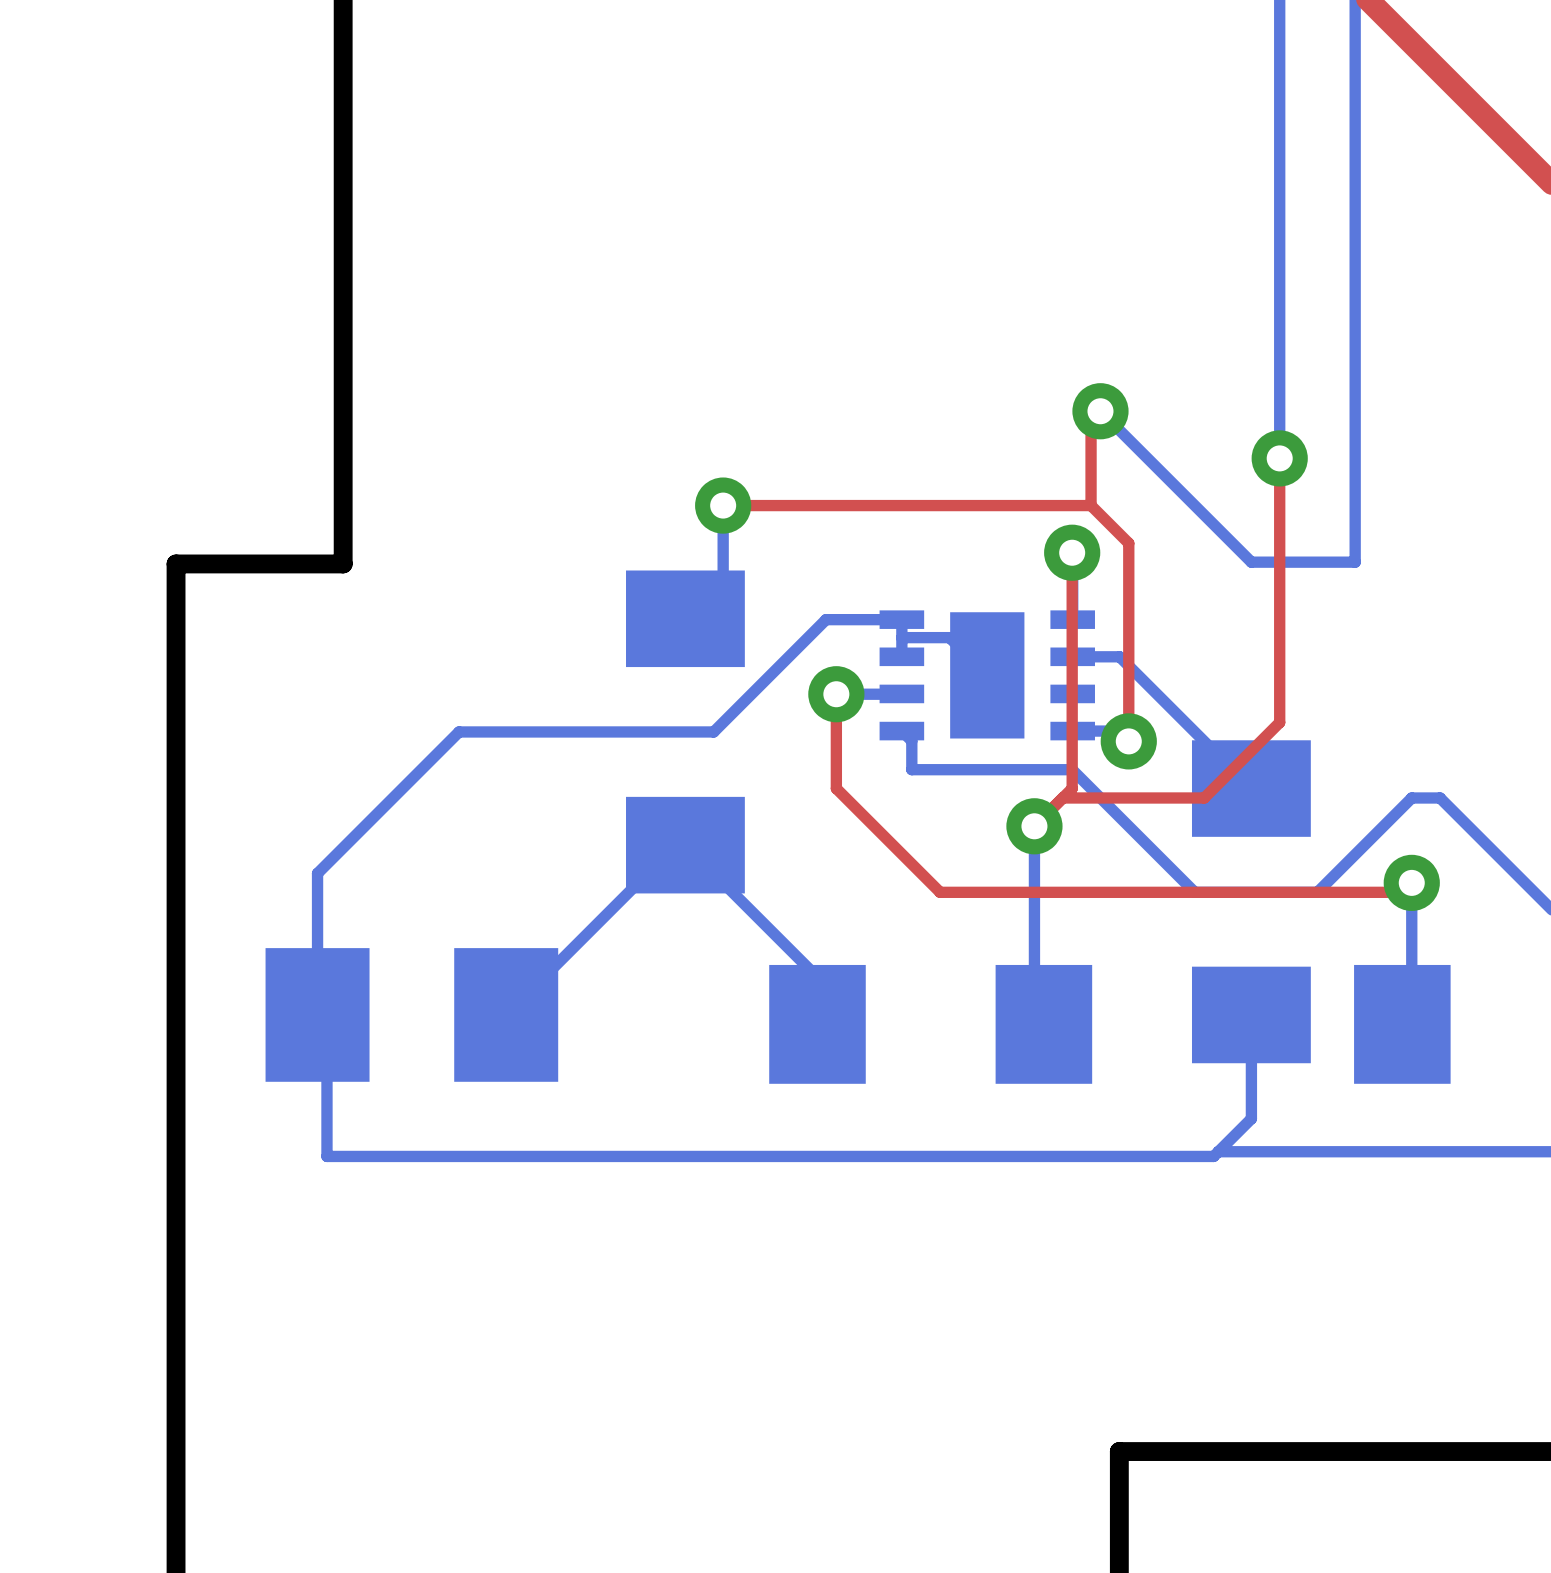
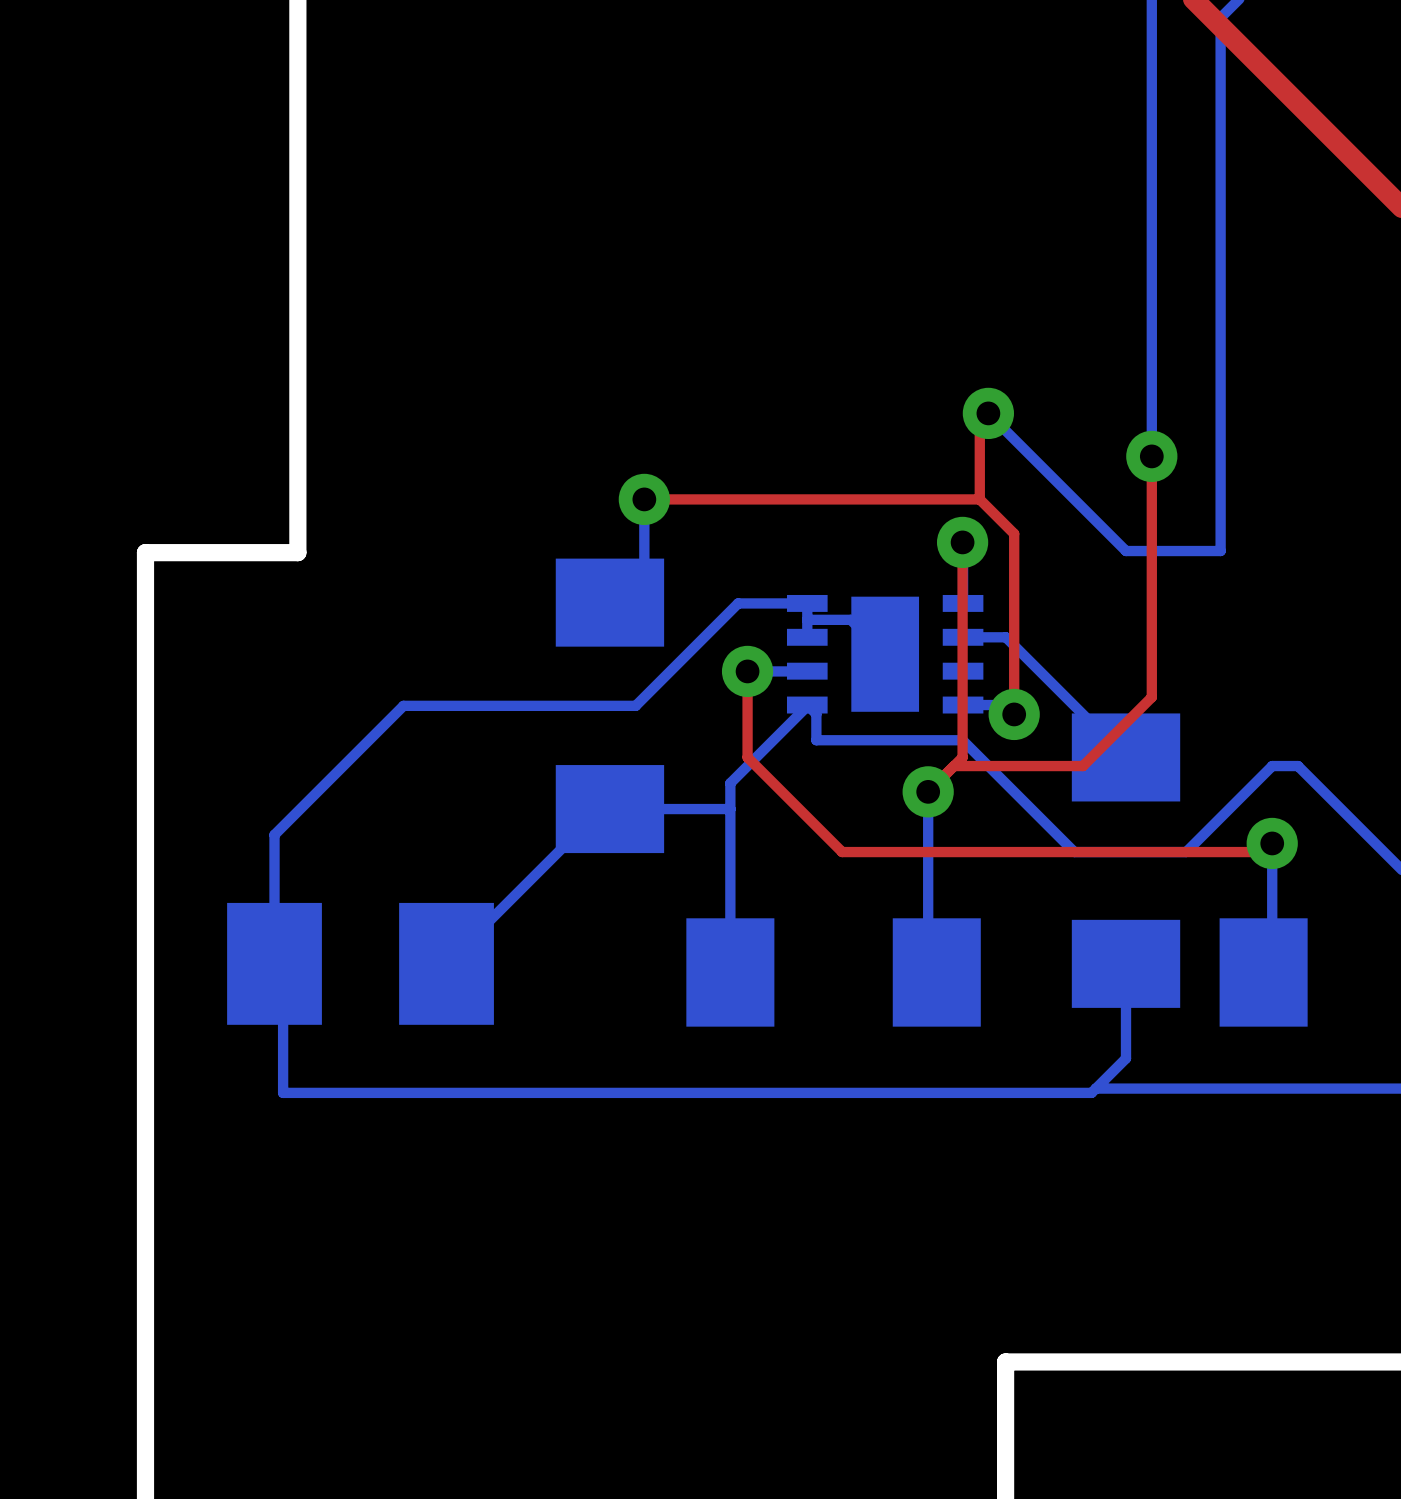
bottom track: none -> (807, 705) (730, 783) (730, 929)
bottom track: (685, 845) (817, 977) -> (609, 809) (730, 809)

